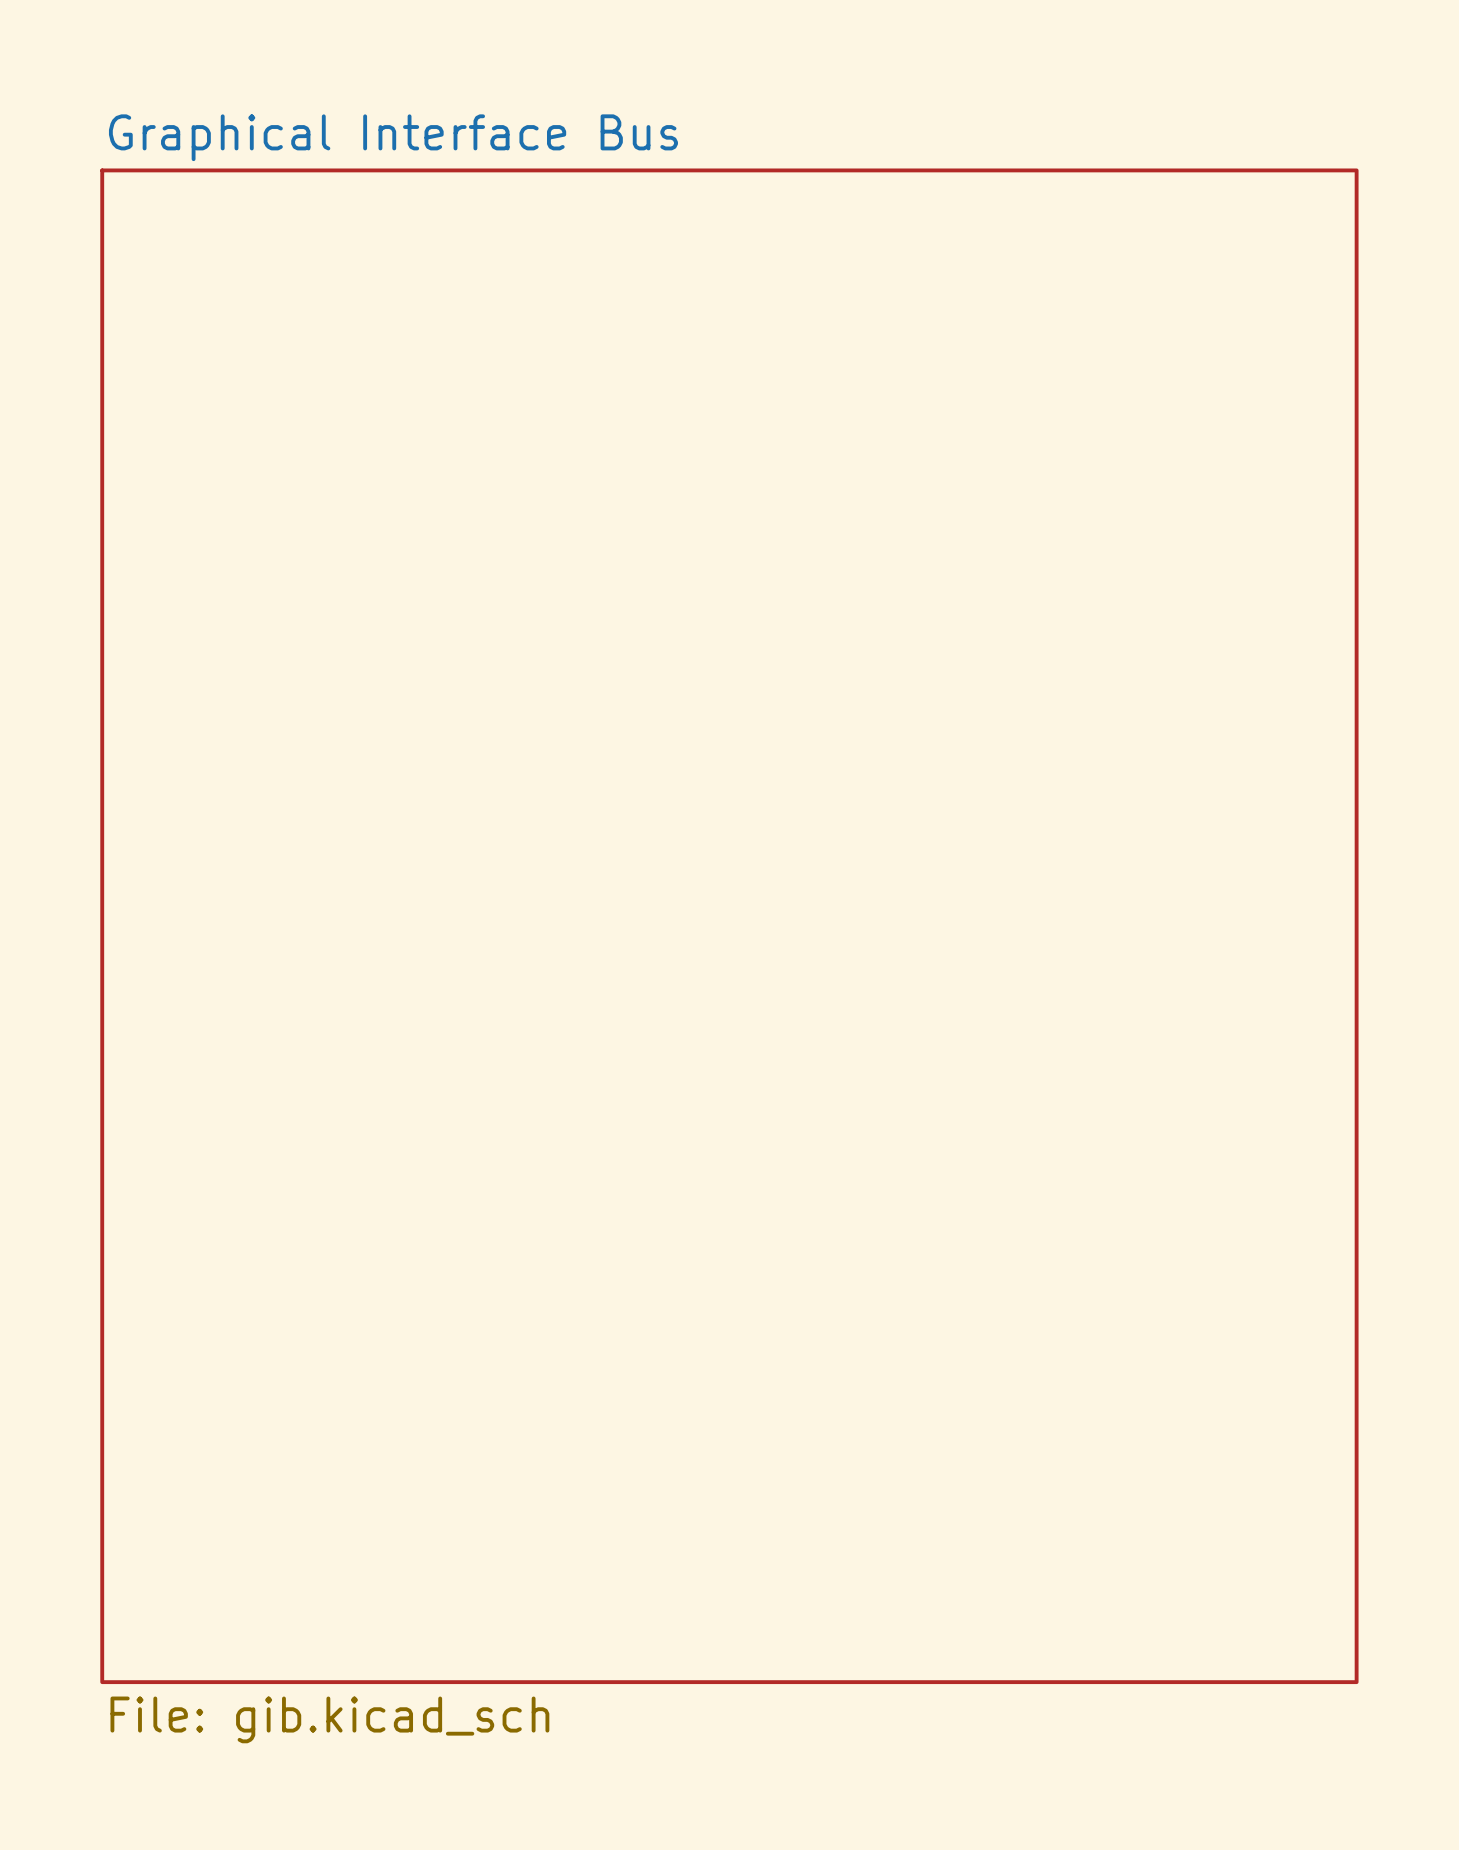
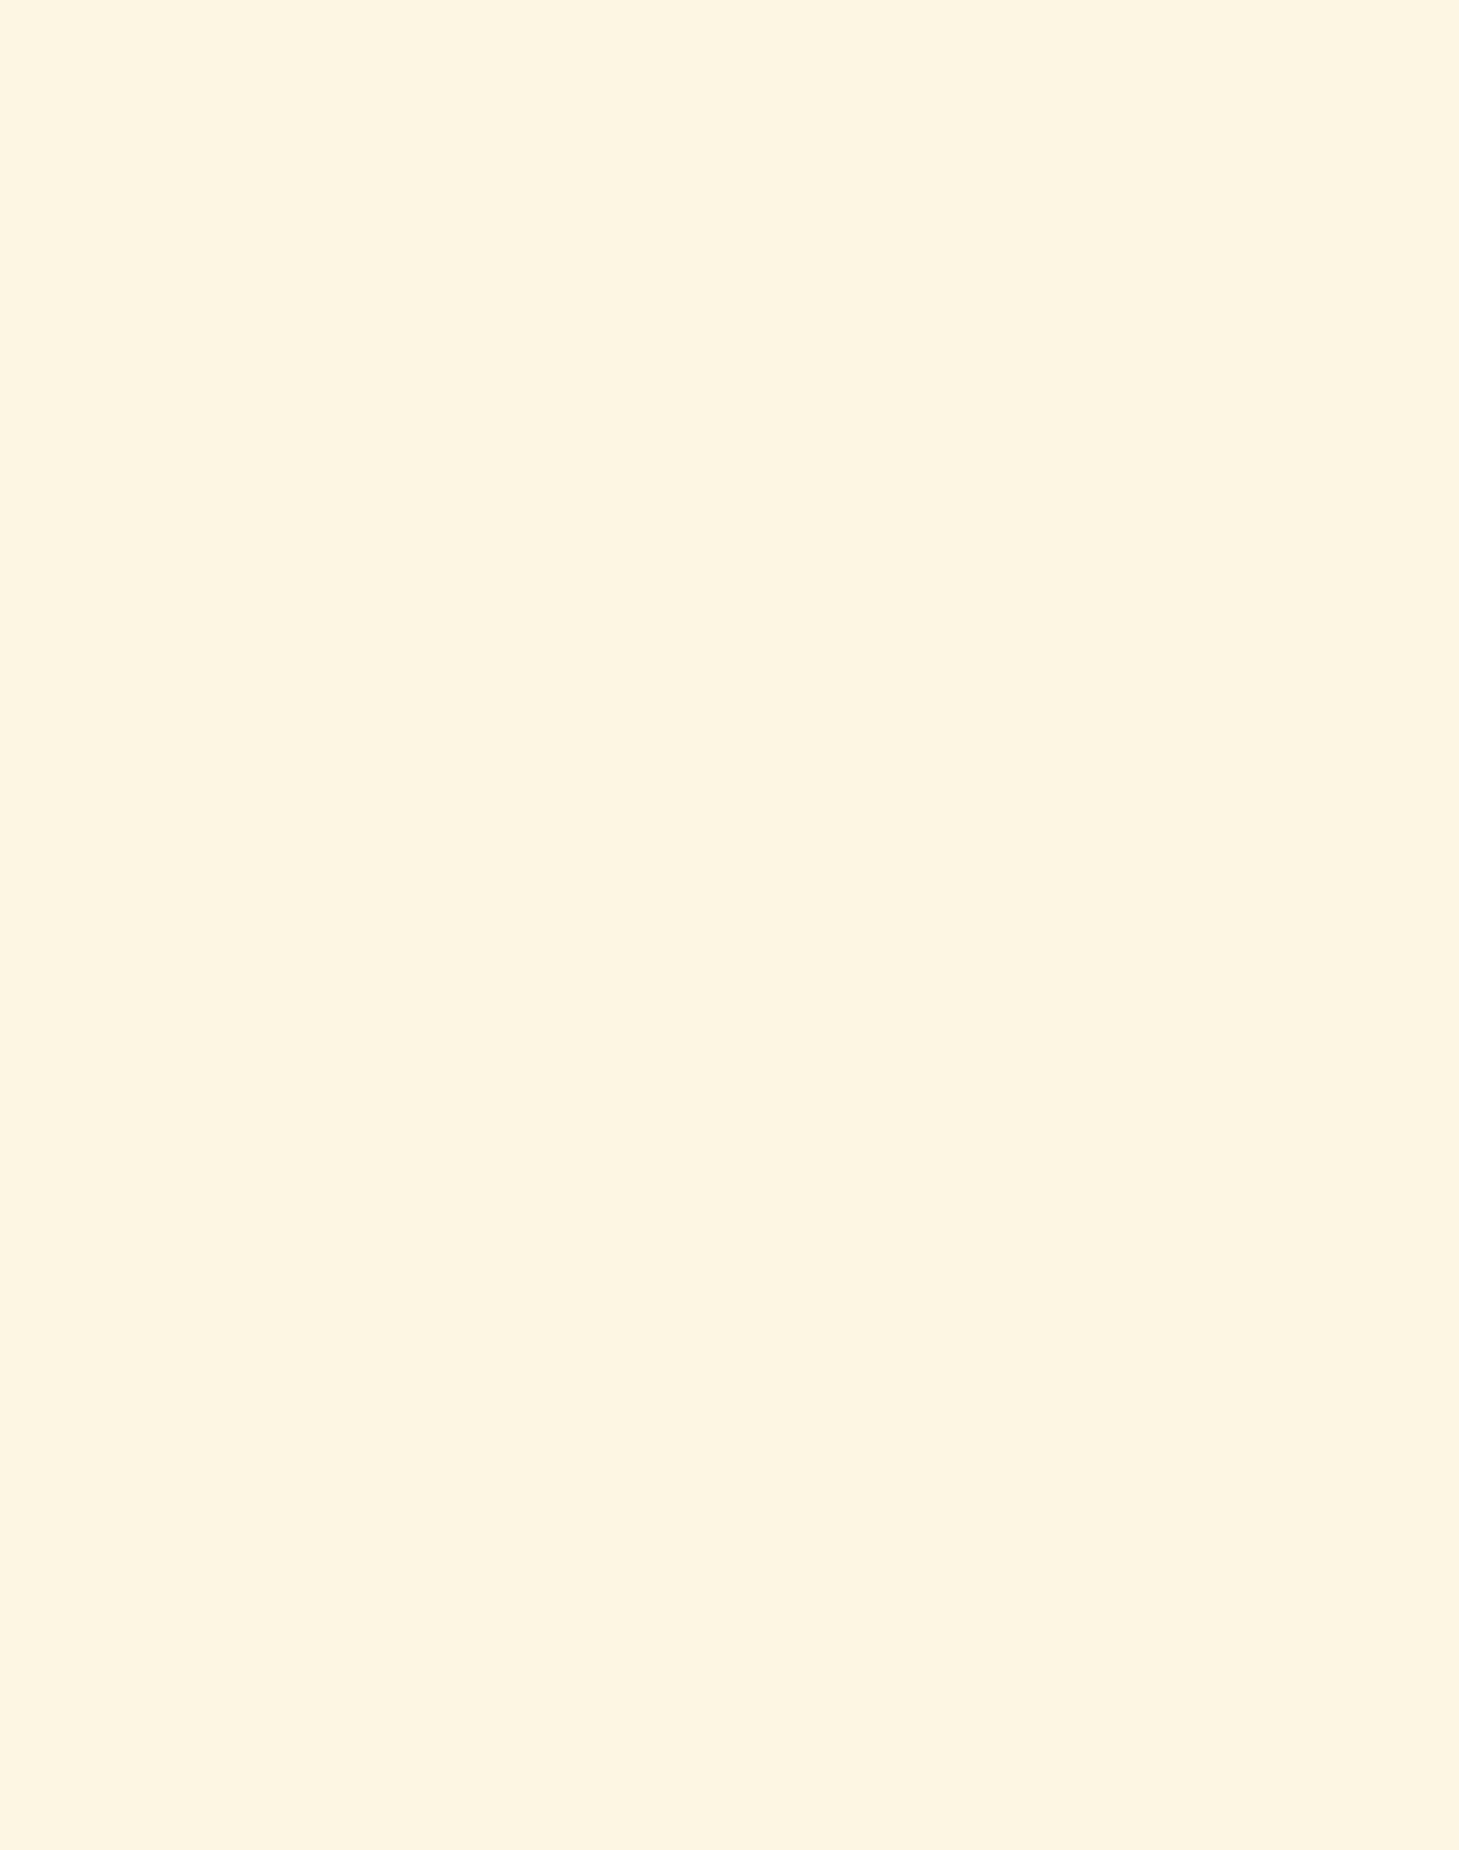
sheet Graphical Interface Bus: File: gib.kicad_sch (729, 926) -> none

